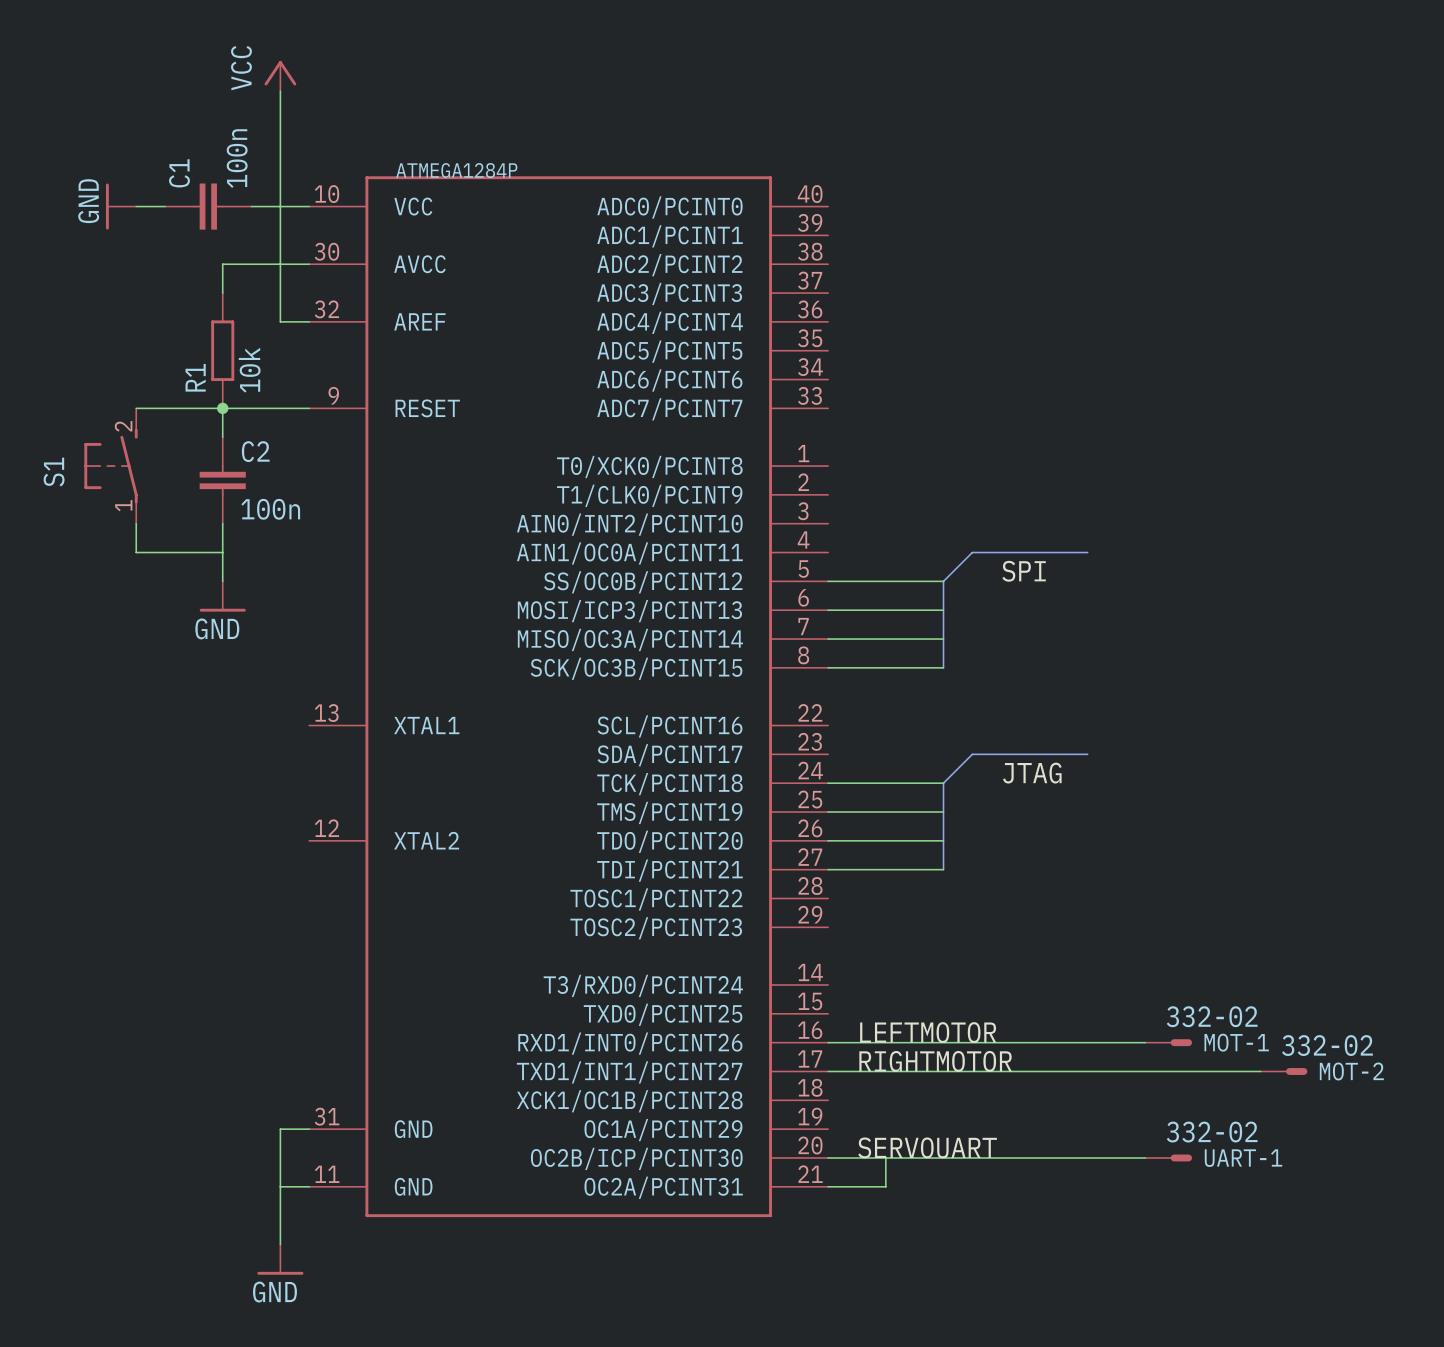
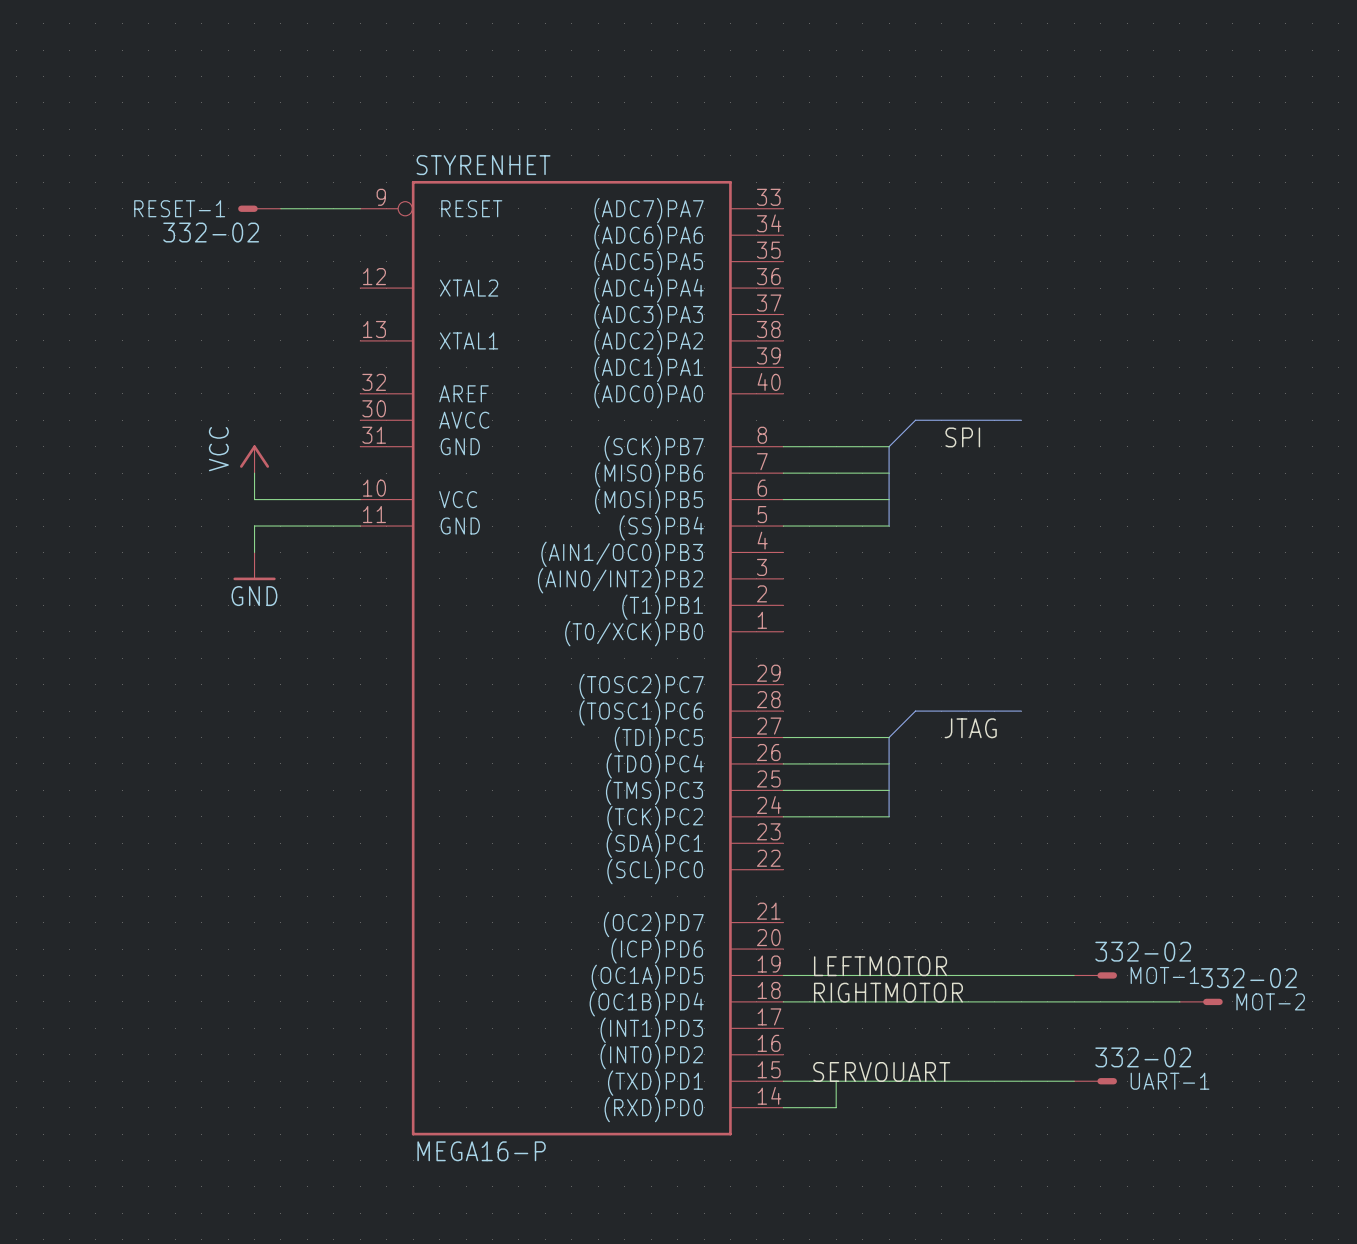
power symbol: VCC (280, 76) -> none
wire: (280, 91) (280, 321) (309, 321) -> none
power symbol: GND (121, 206) -> none
C1: 100n (208, 206) -> none
RESET-1: none -> 332-02 (259, 208)
wire: (309, 264) (222, 264) (222, 293) -> none
R1: 10k (222, 350) -> none
wire: (136, 408) (309, 408) -> none
wire: (222, 408) (222, 437) -> none
junction: (222, 408) -> none
S1: (111, 466) -> none
power symbol: none -> VCC (254, 459)
C2: 100n (222, 480) -> none
wire: none -> (254, 473) (254, 499) (360, 499)
wire: (136, 523) (136, 552) (222, 552) -> none
wire: (222, 523) (222, 581) -> none
wire: none -> (360, 526) (254, 526) (254, 552)
bus: (1087, 552) (972, 552) (943, 581) (943, 667) -> (1021, 420) (915, 420) (889, 446) (889, 526)
label position: SPI (1024, 571) -> SPI (962, 437)
wire: (828, 581) (943, 581) -> (783, 446) (889, 446)
power symbol position: GND (222, 596) -> GND (254, 566)
wire: (828, 610) (943, 610) -> (783, 473) (889, 473)
wire: (828, 639) (943, 639) -> (783, 499) (889, 499)
wire: (828, 667) (943, 667) -> (783, 526) (889, 526)
ATMEGA1284P: (568, 696) -> none
STYRENHET: none -> MEGA16-P (571, 658)
wire: (309, 1129) (280, 1129) (280, 1244) -> none
wire: (280, 1186) (309, 1186) -> none
power symbol: GND (280, 1259) -> none

